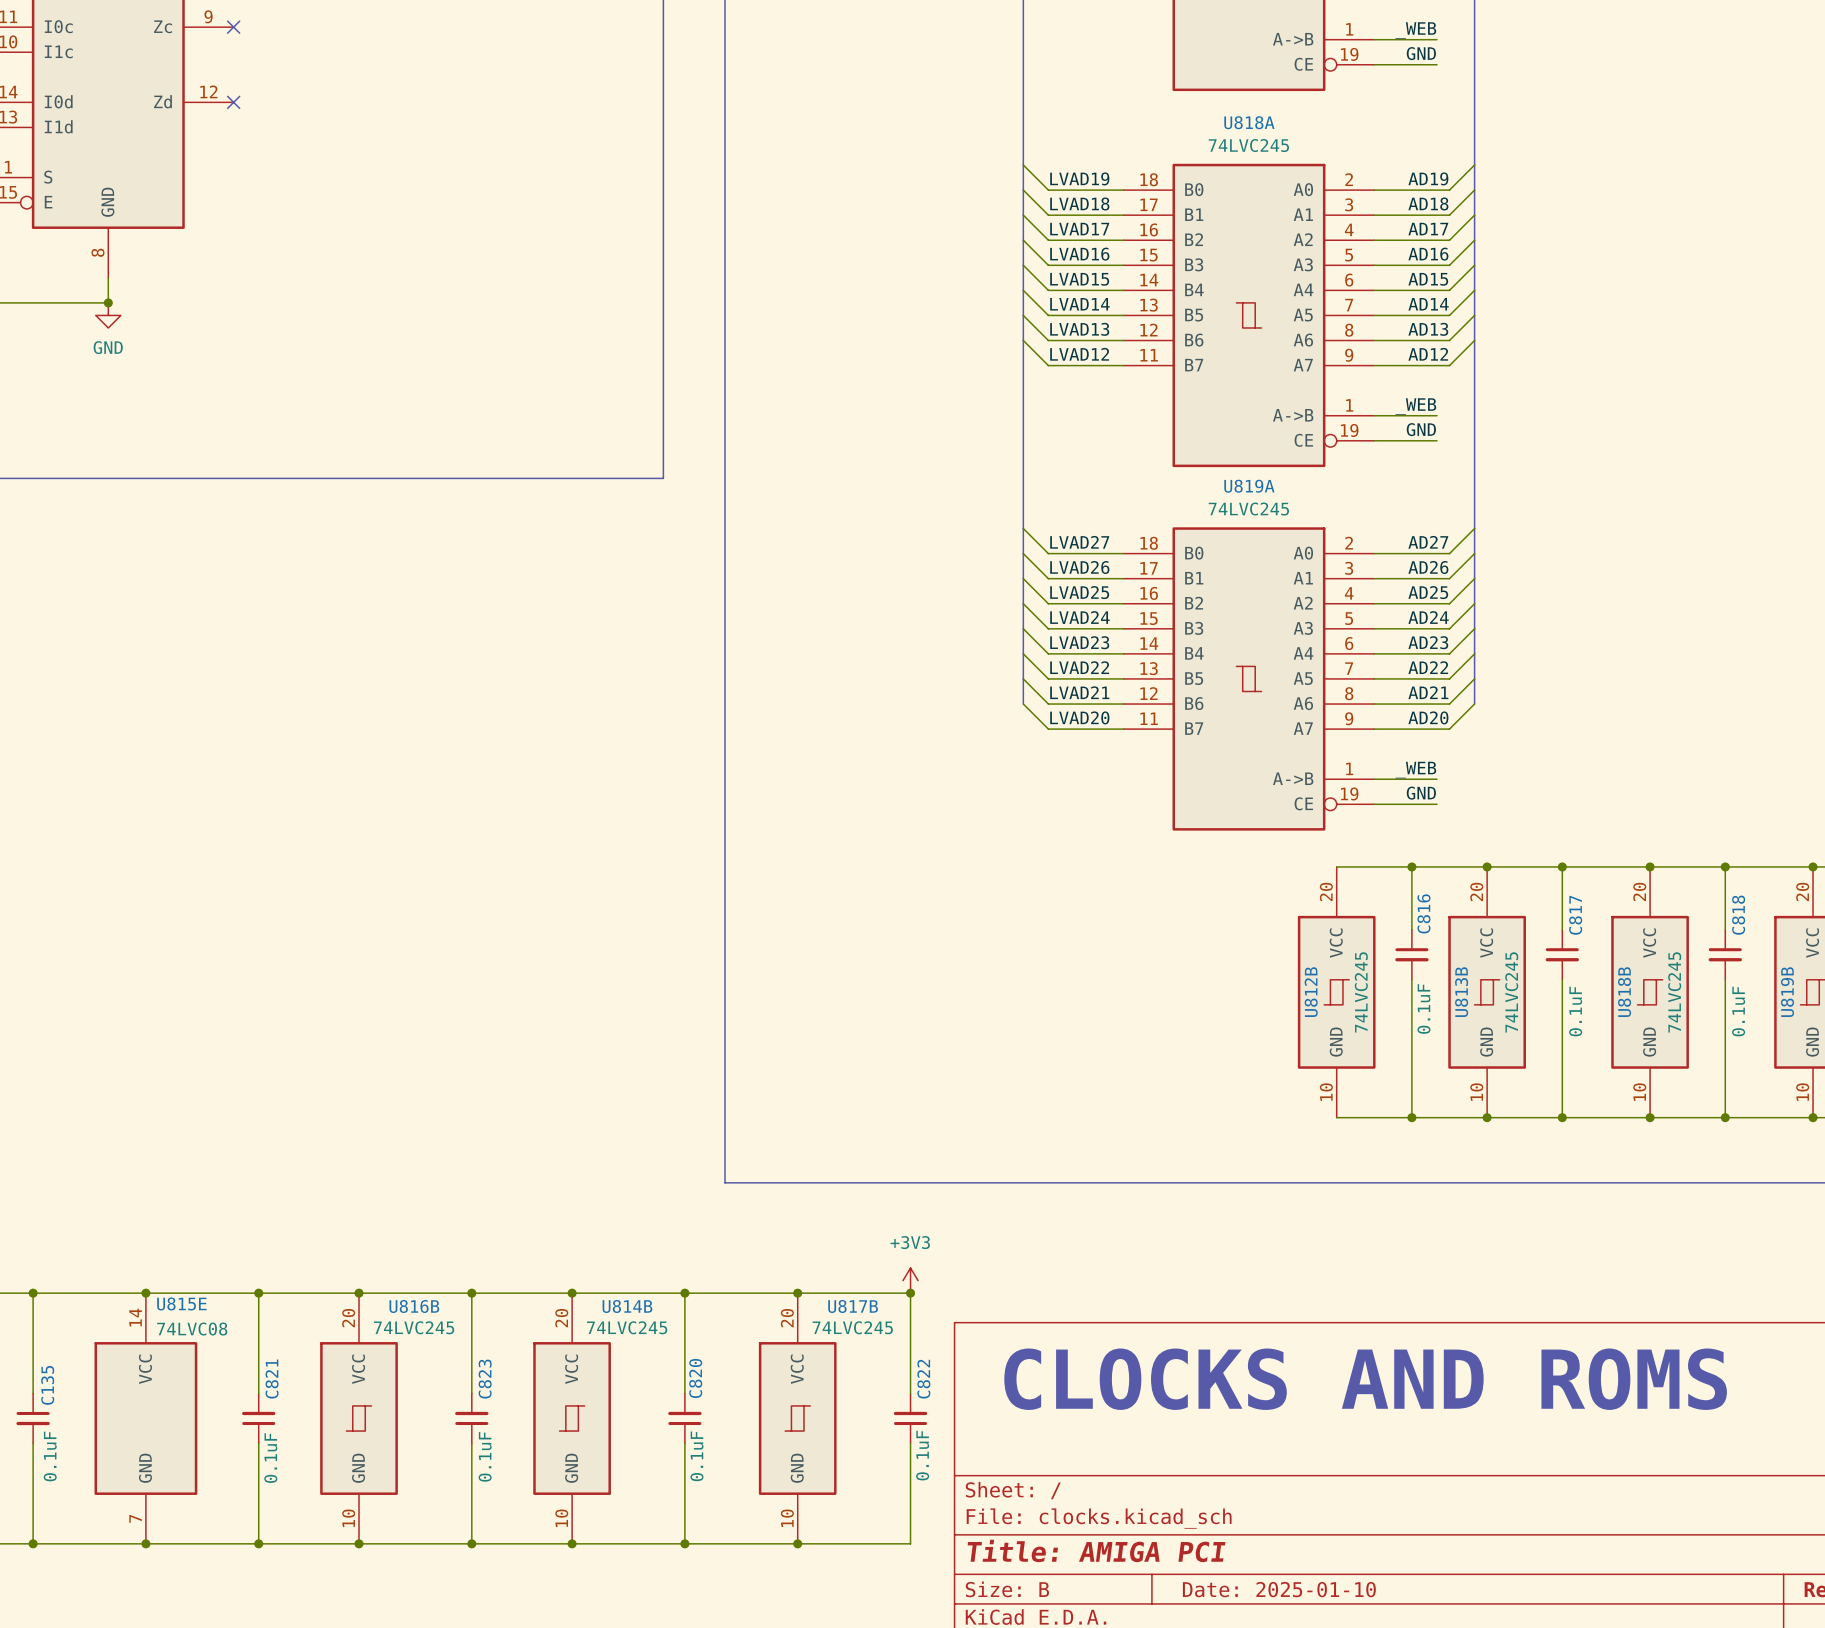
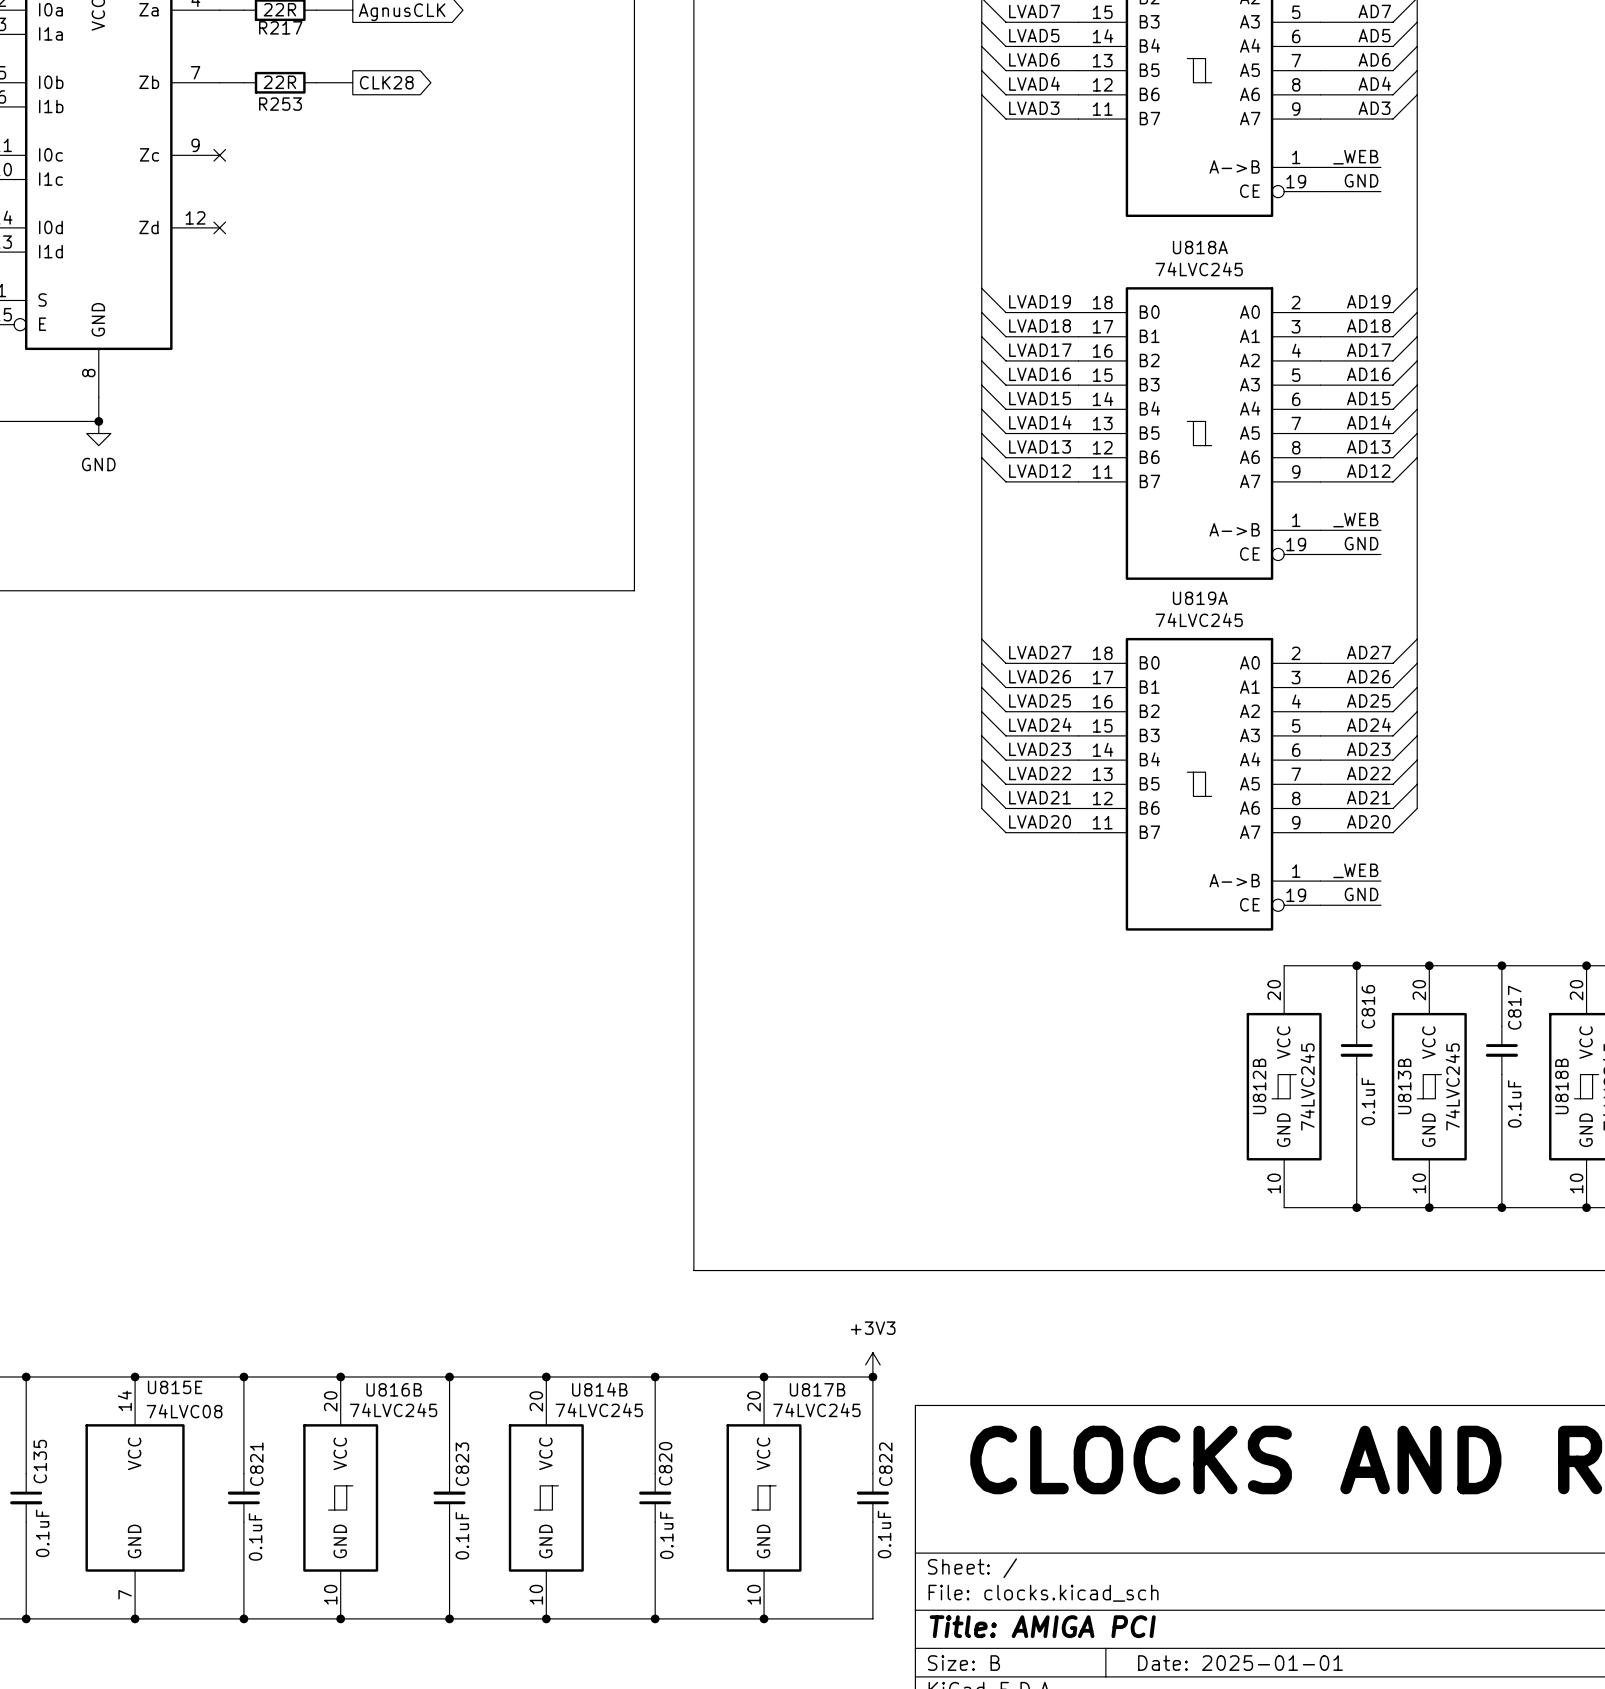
title block: Date: 2025-01-10 (1279, 1589) -> Date: 2025-01-01 (1240, 1663)

